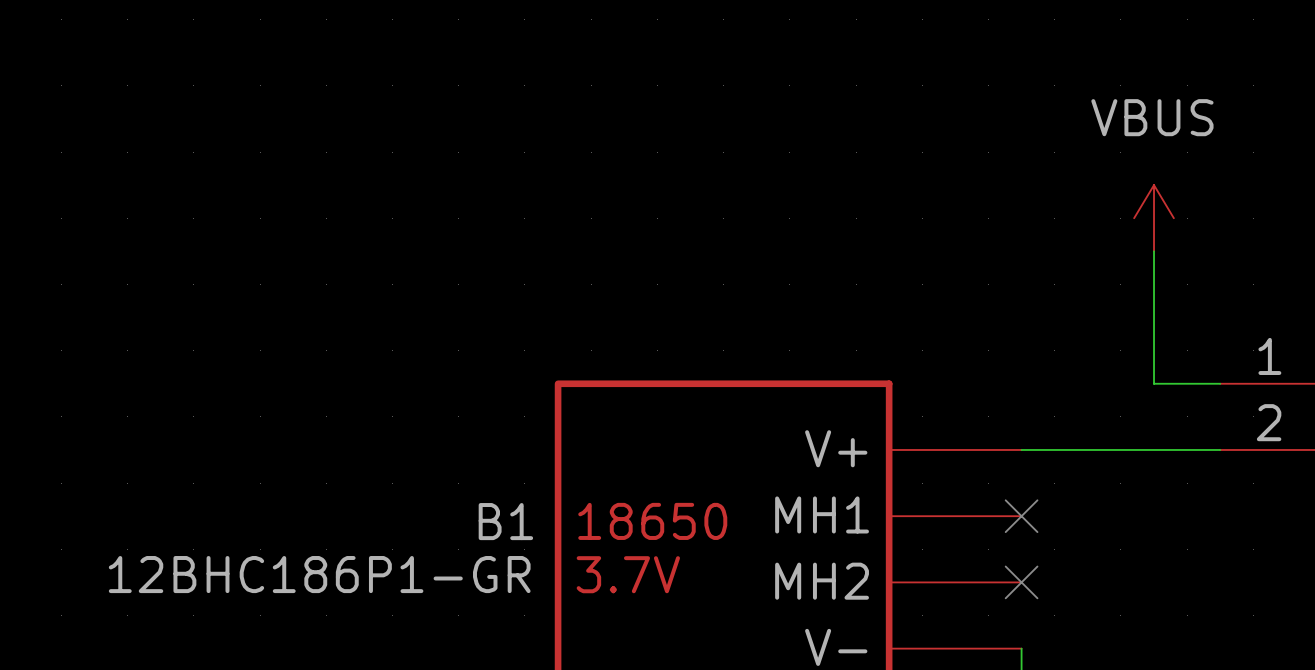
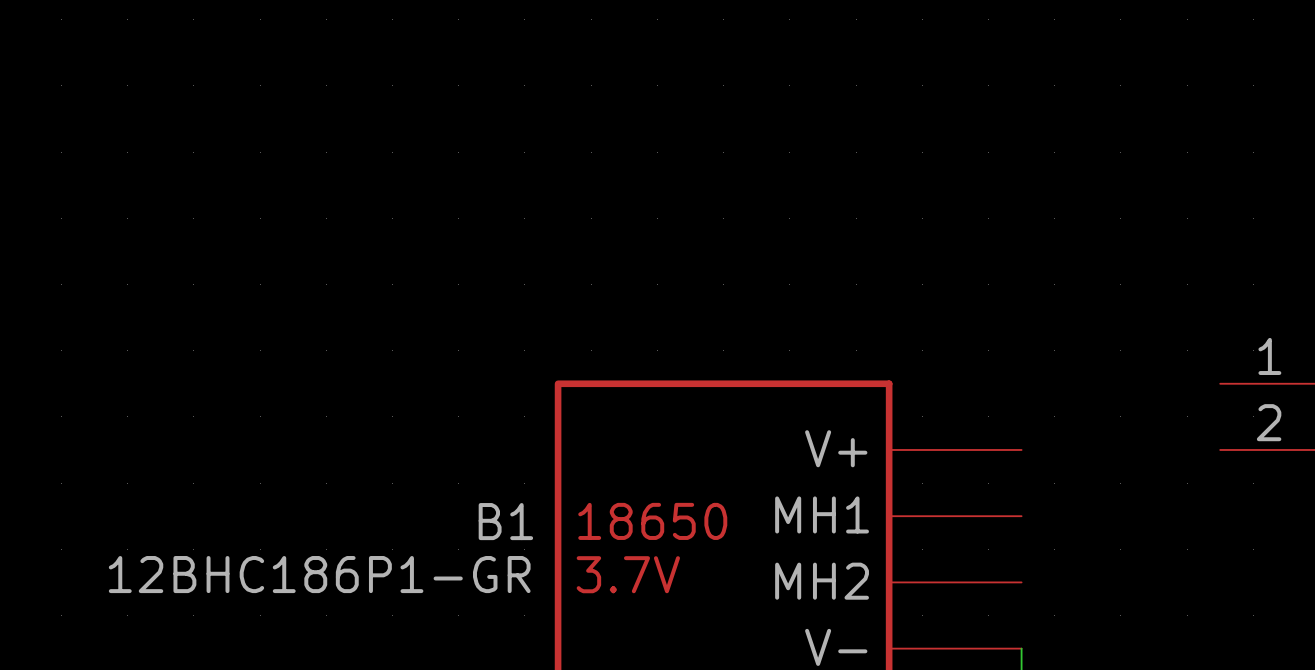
power symbol: VBUS (1154, 218) -> none
wire: (1154, 251) (1154, 383) (1220, 383) -> none
wire: (1021, 449) (1220, 449) -> none
no-connect mark: (1021, 516) -> none
no-connect mark: (1021, 582) -> none

